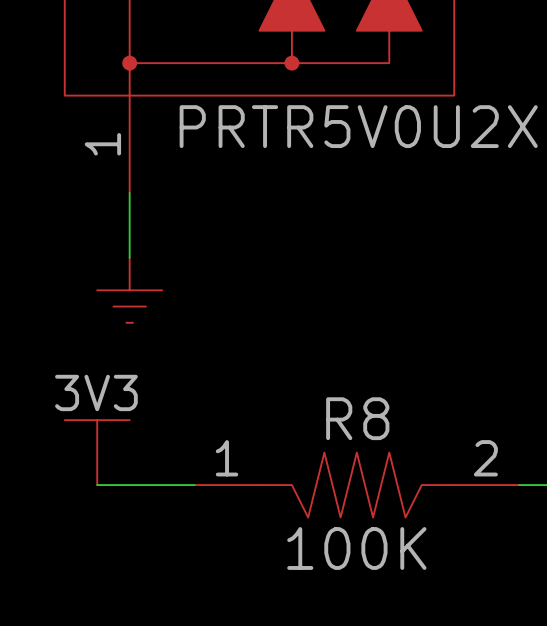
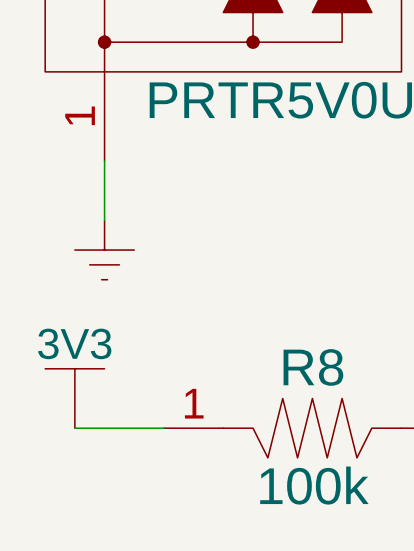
R8 value: 100K (356, 548) -> 100k (314, 485)

